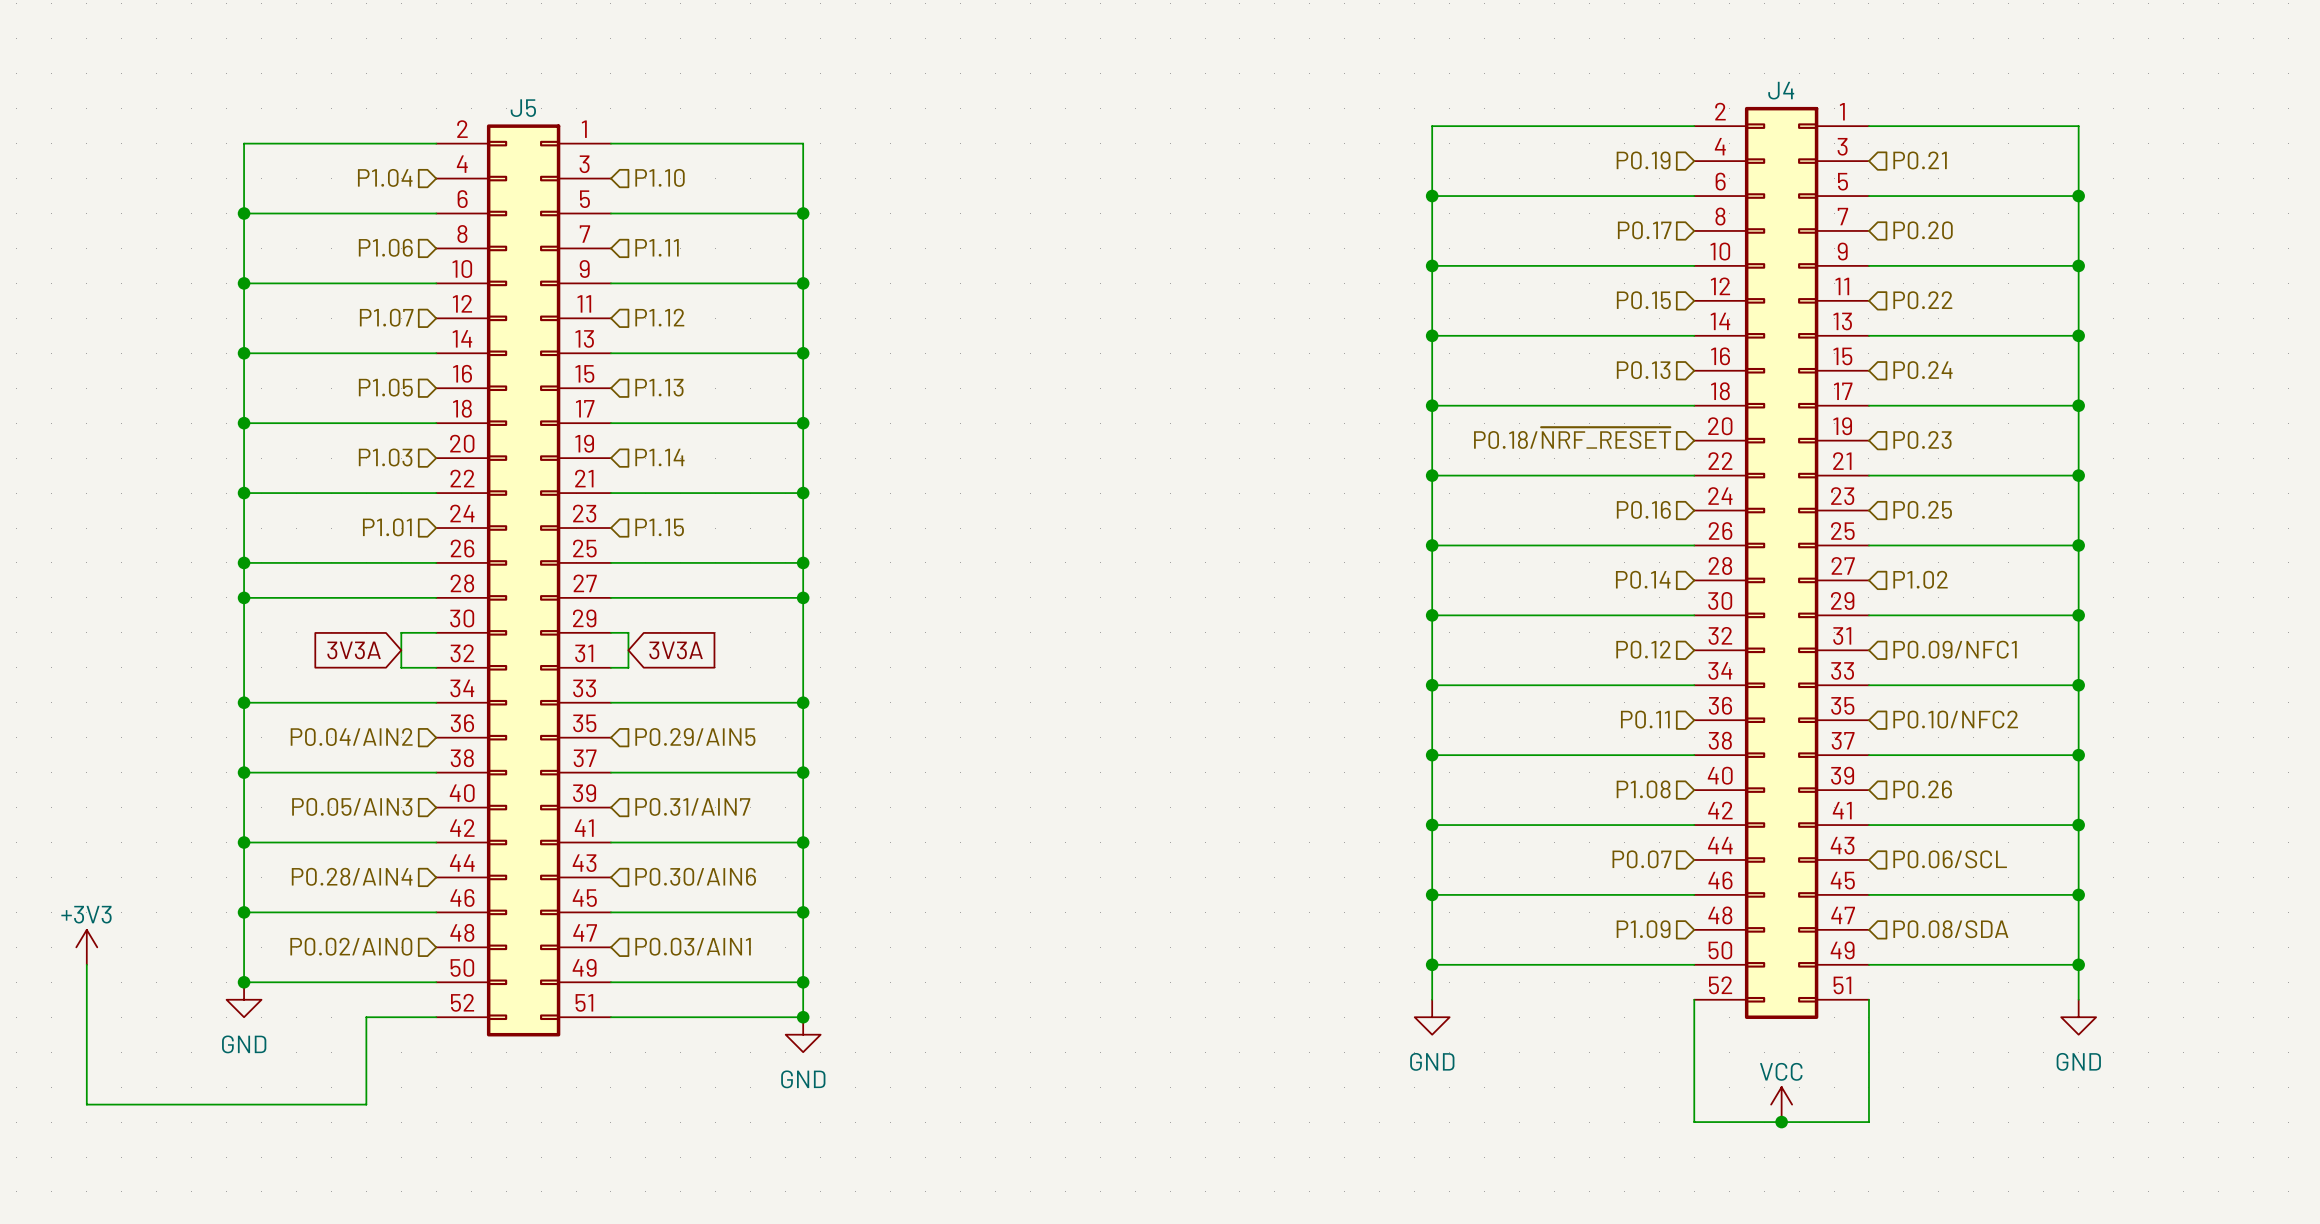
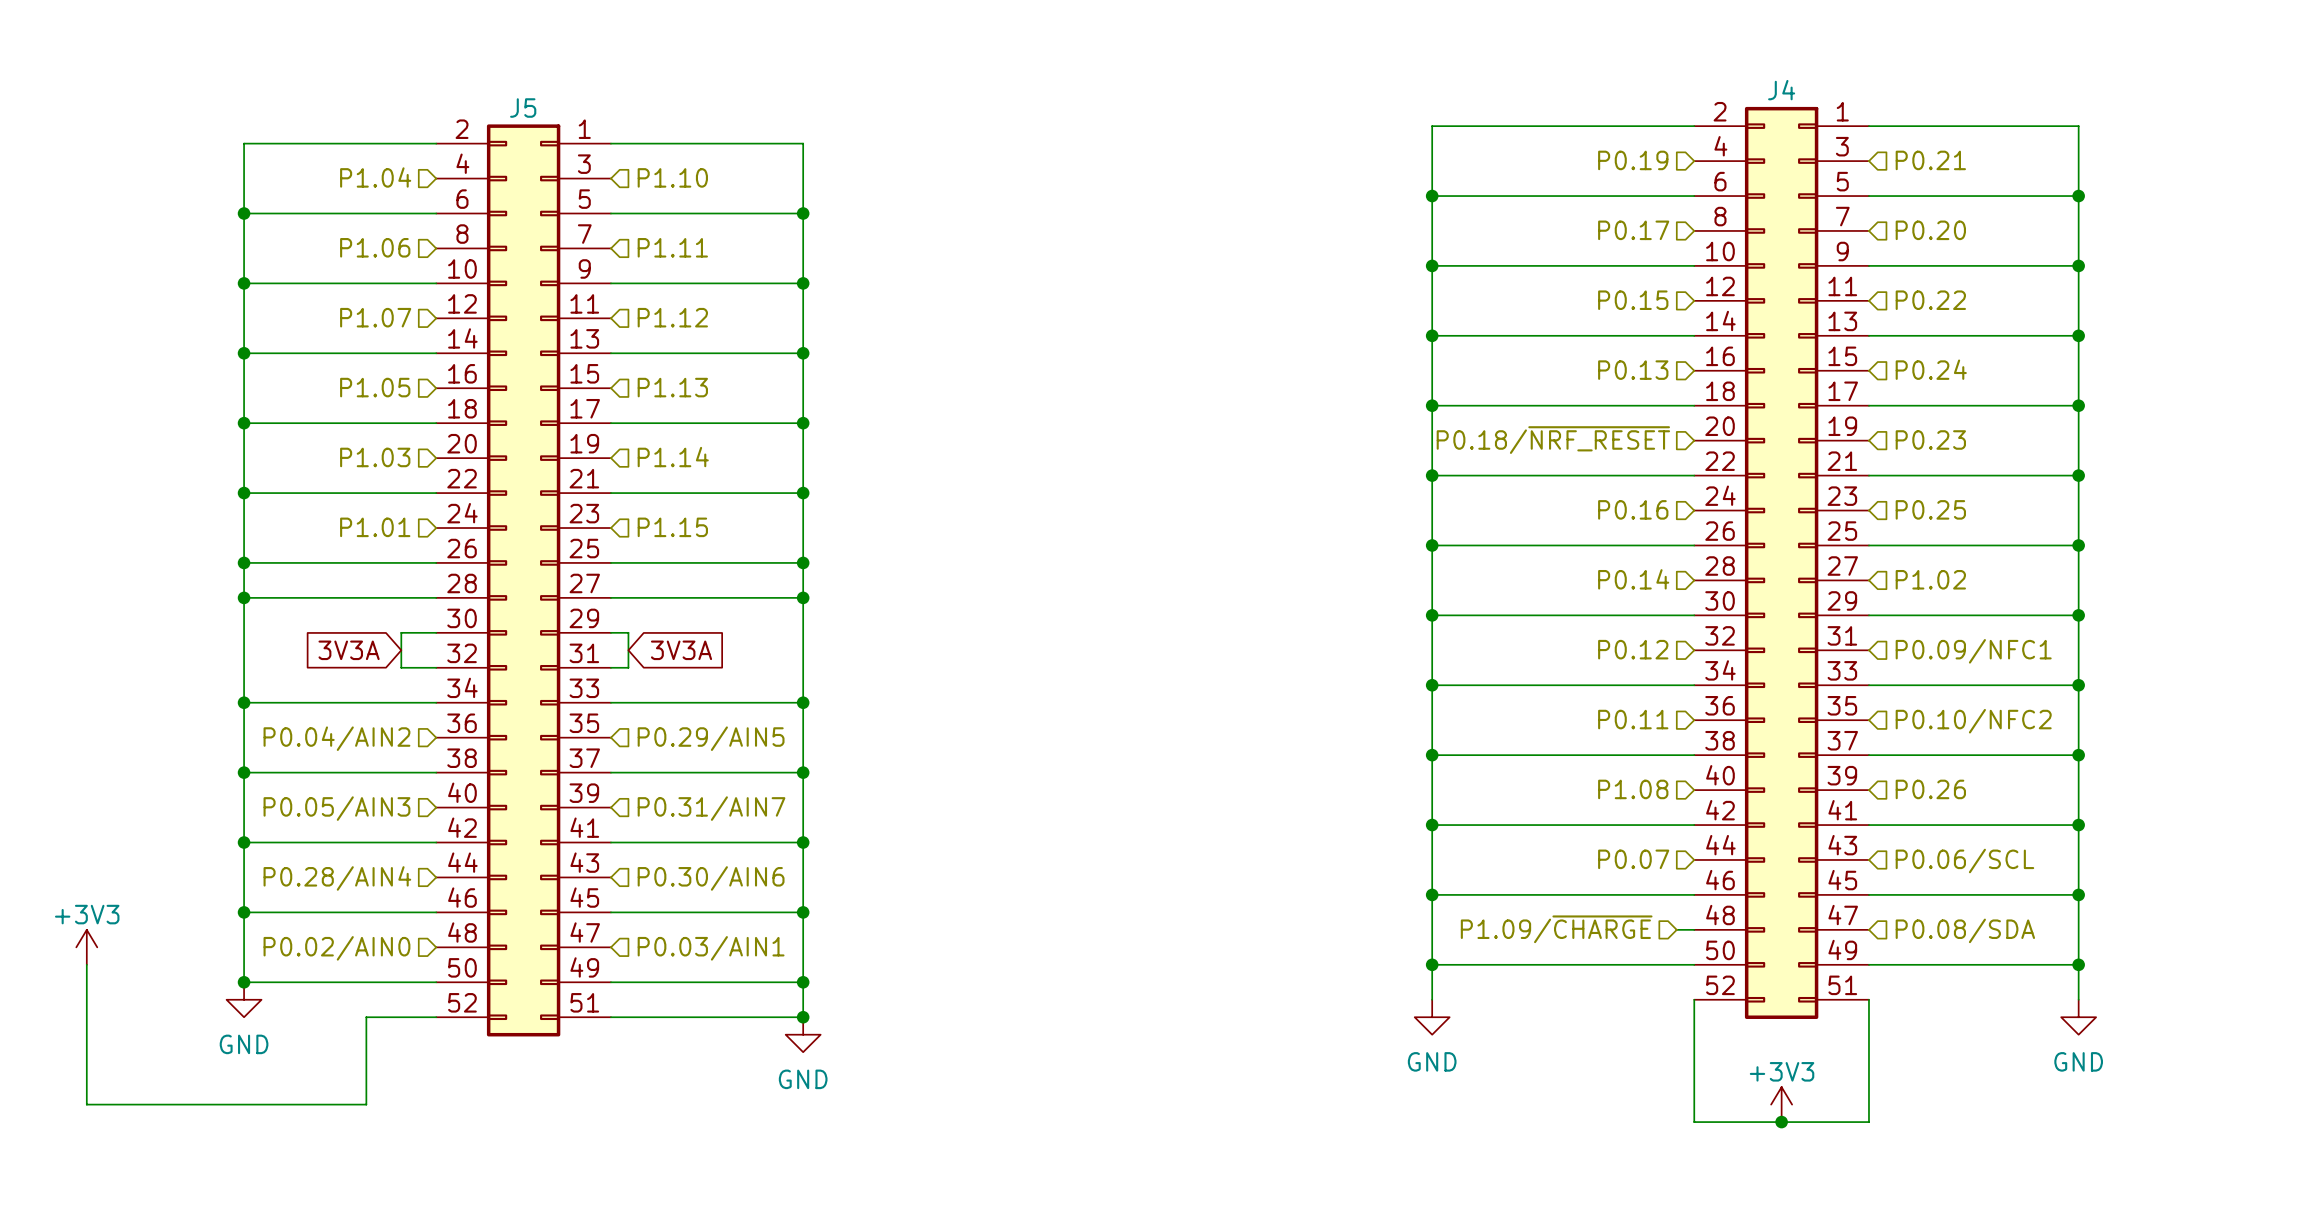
hierarchical label: none -> P1.09/~{CHARGE} (1556, 929)
hierarchical label: P1.09 (1643, 929) -> none
wire: none -> (1676, 929) (1694, 929)
power symbol: VCC (1781, 1104) -> +3V3 (1781, 1104)

